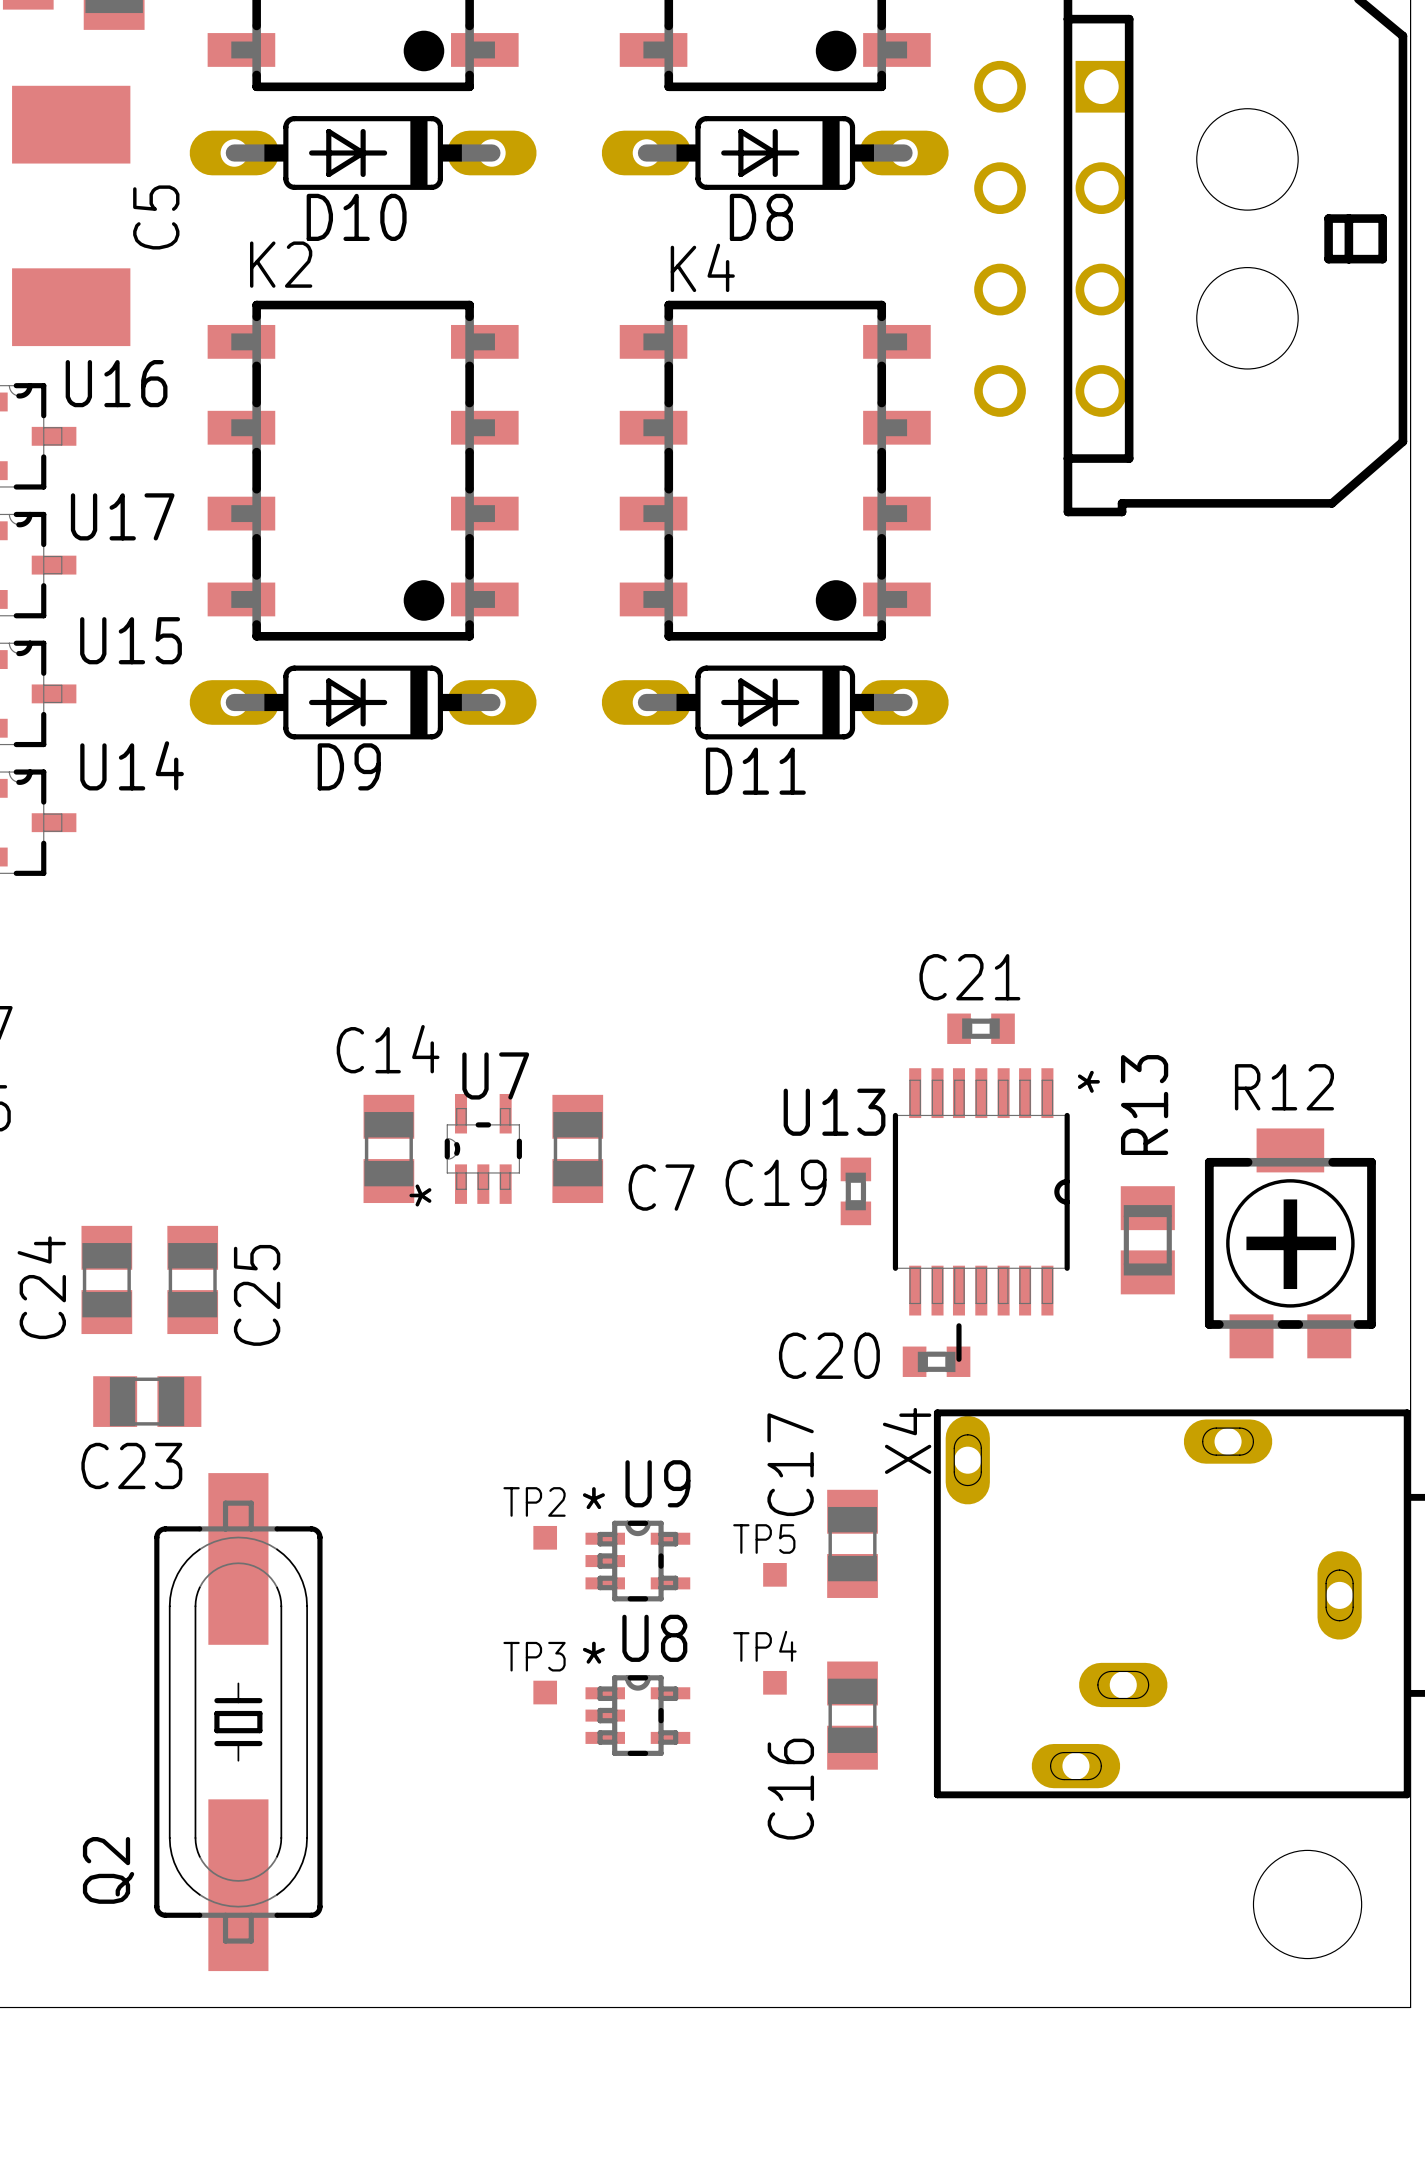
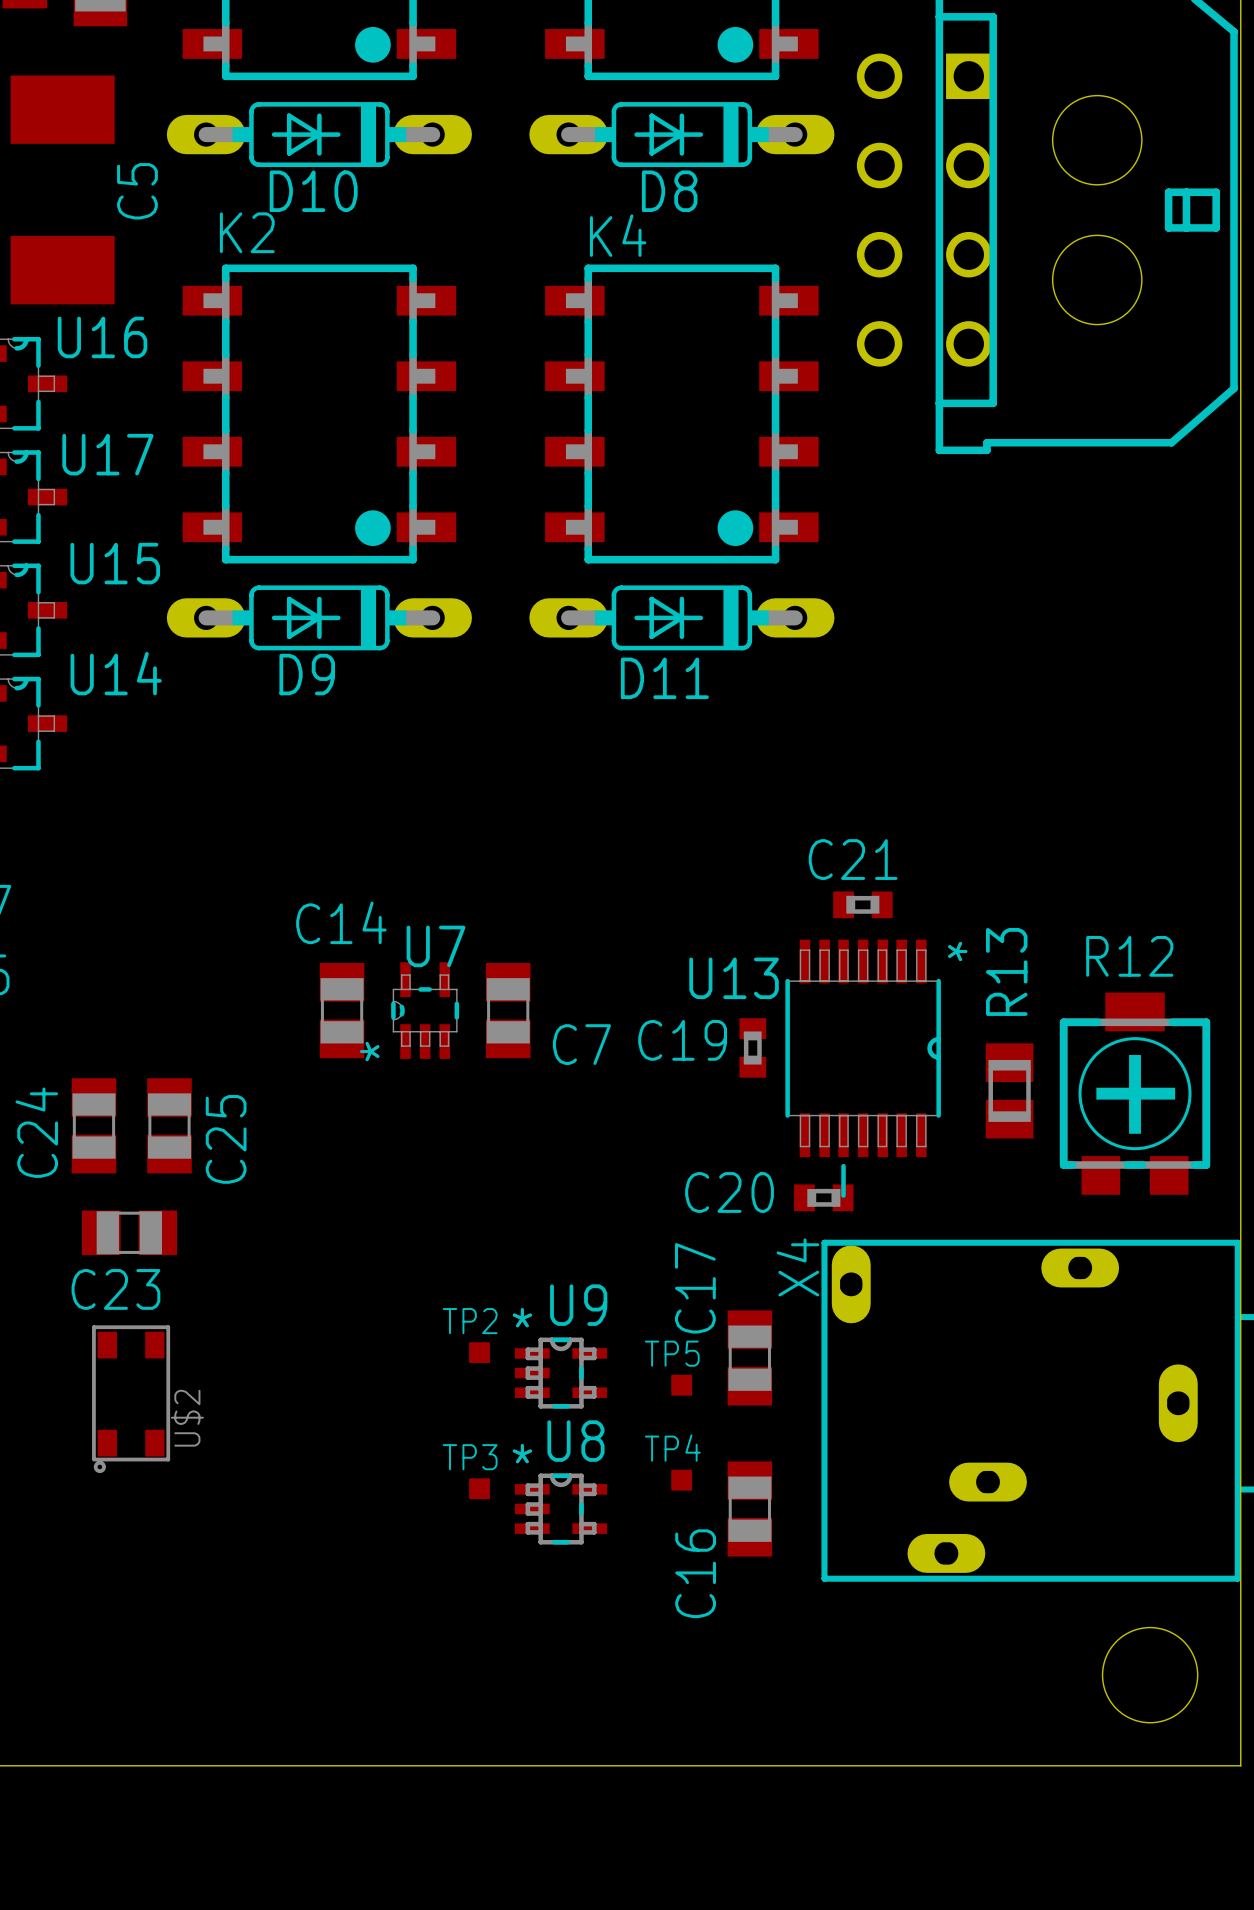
U$2: none -> (131, 1399)
Q2: (238, 1722) -> none

